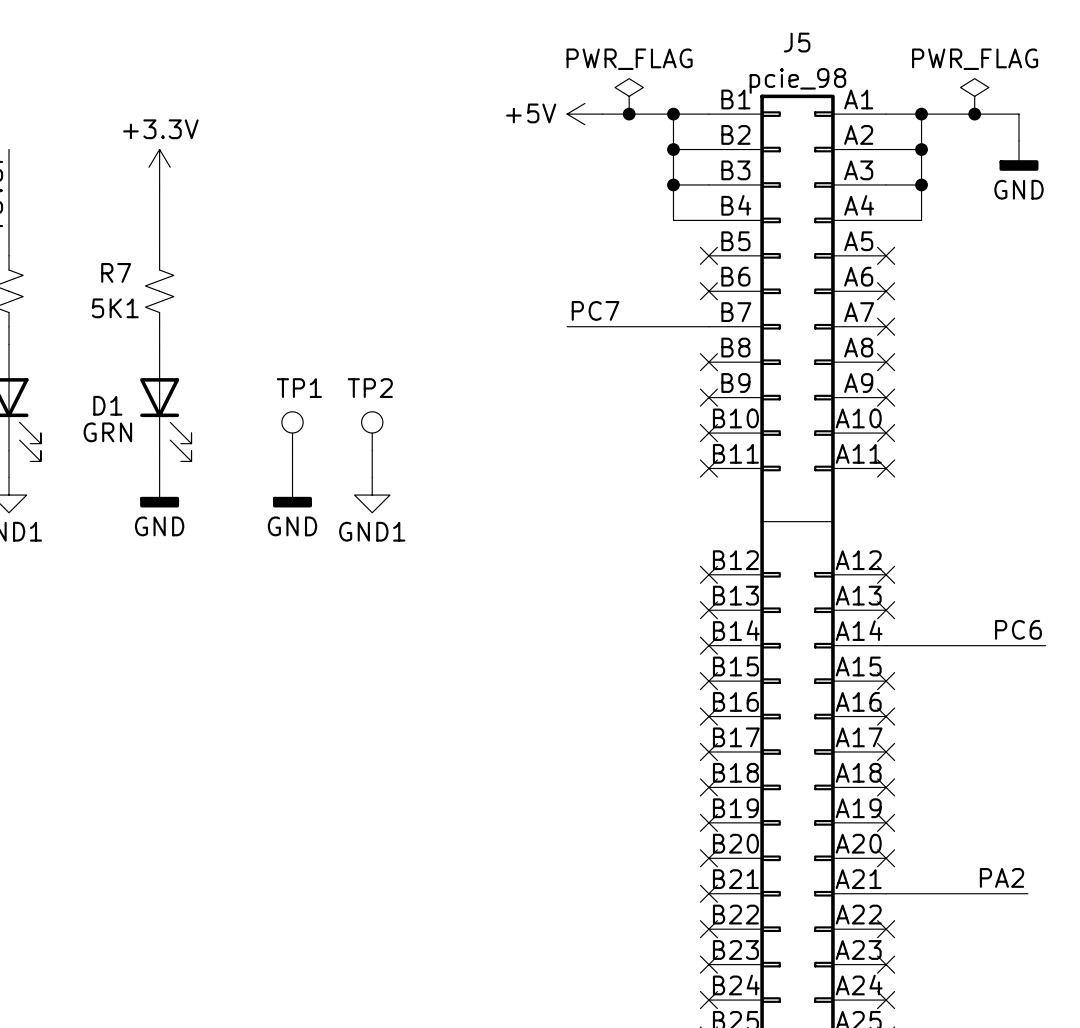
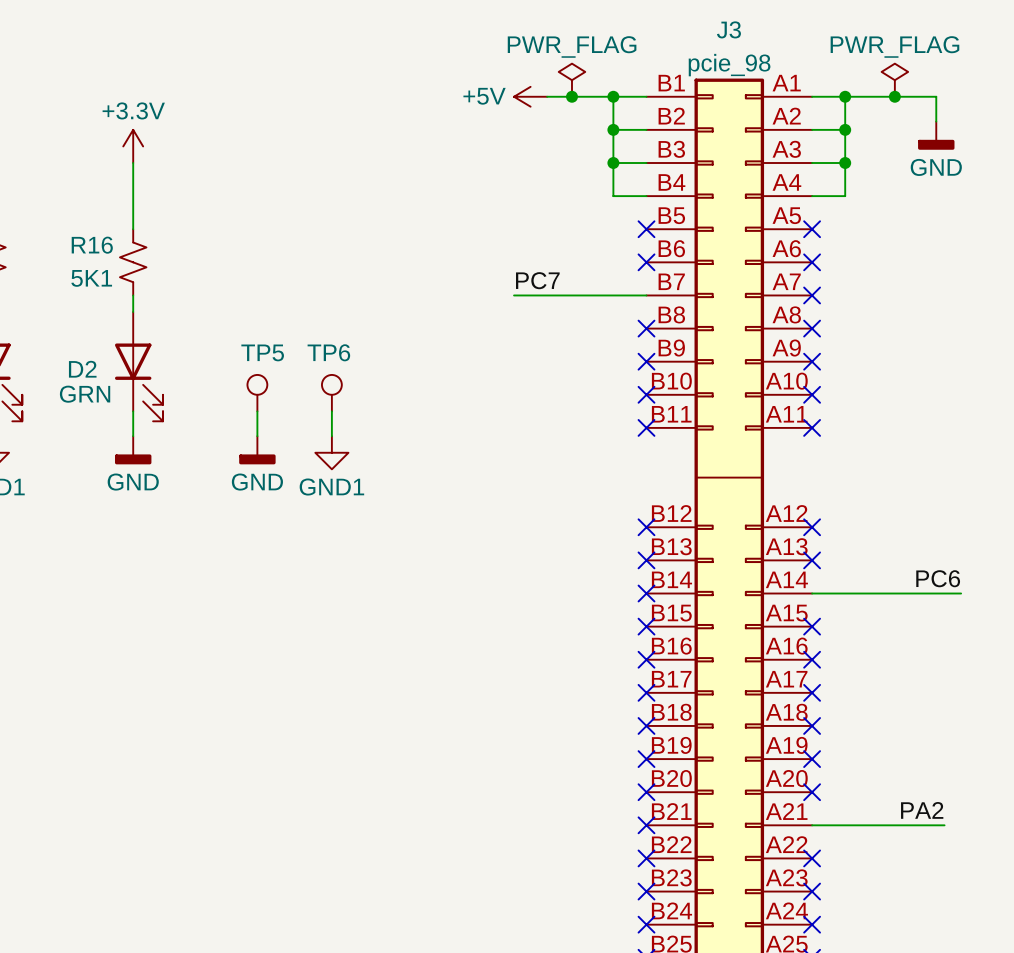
J5 name: J5 (797, 42) -> J3 (728, 29)
R7 name: R7 (116, 272) -> R16 (92, 245)
TP1 name: TP1 (299, 388) -> TP5 (262, 352)
TP2 name: TP2 (370, 388) -> TP6 (328, 352)
D1 name: D1 (107, 405) -> D2 (82, 369)

